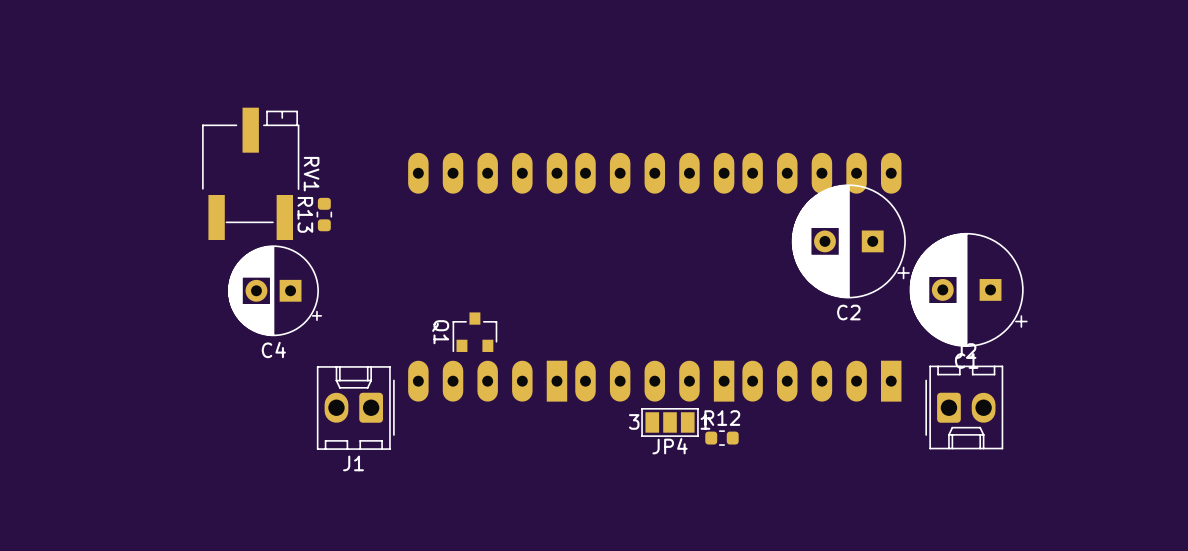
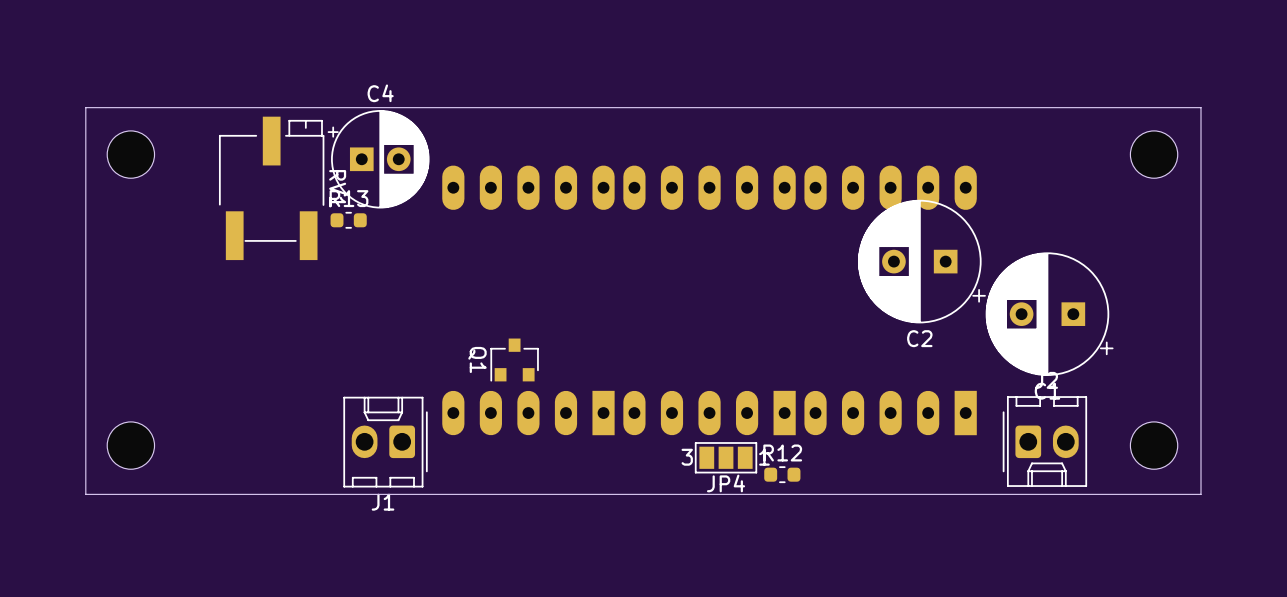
board edge: none -> (1201, 107) (85, 107) (85, 494) (1201, 494) (1201, 107)
part: none -> (130, 154)
part: none -> (1154, 154)
R13 rotation: 0° (324, 214) -> 90° clockwise (348, 220)
C4 rotation: 0° (275, 290) -> 180° (378, 159)
C4 position: (275, 290) -> (378, 159)
part: none -> (130, 445)
part: none -> (1154, 445)

